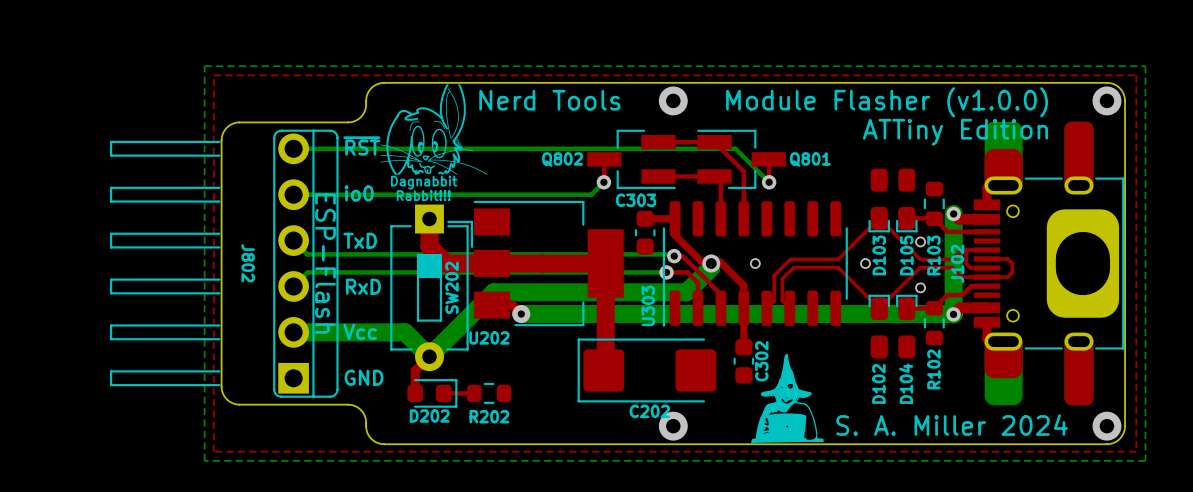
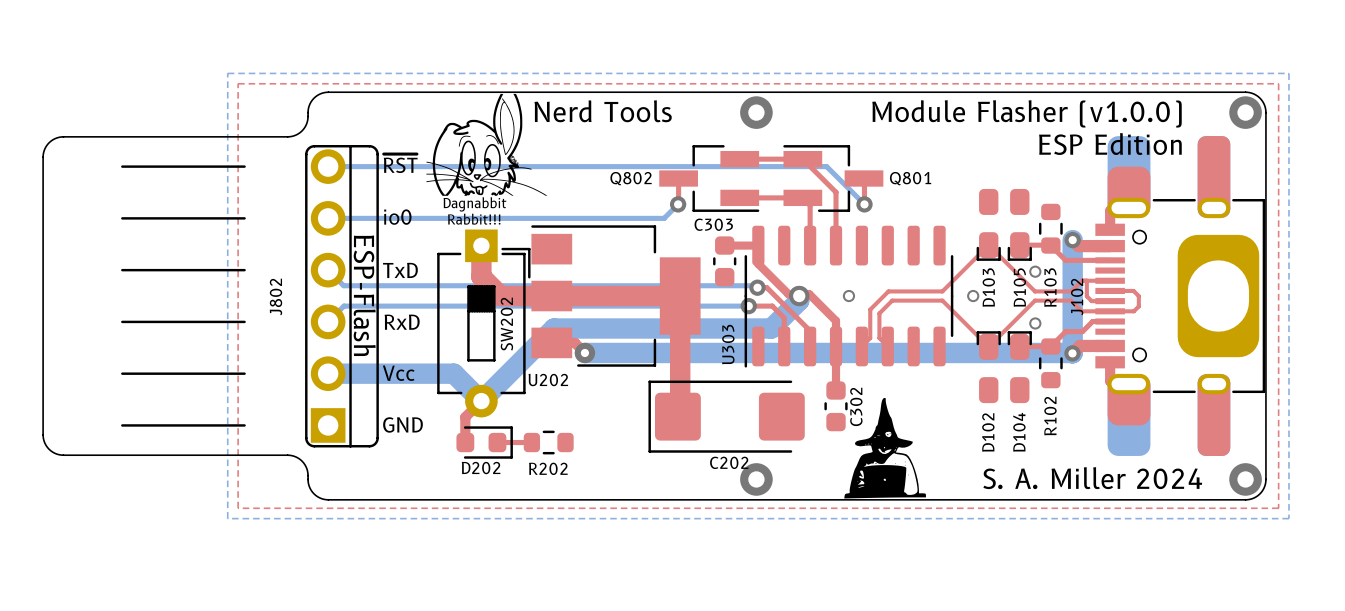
board edge: (384, 82) (376, 84) (370, 89) (366, 96) (364, 112) (354, 121) (257, 122) -> (430, 92) (321, 93) (314, 98) (310, 103) (307, 121) (303, 129) (296, 134) (287, 136)
board edge: (239, 122) (226, 127) (221, 140) (221, 388) (226, 399) (239, 404) -> (267, 136) (61, 136) (49, 142) (44, 150) (43, 157) (43, 434) (47, 447) (54, 453) (63, 455) (267, 455)
text: ATTiny Edition (955, 132) -> ESP Edition (1110, 143)
J802 footprint: [110, 133, 309, 394] -> [121, 149, 346, 443]
J802 name rotation: 0° (248, 263) -> 180° (275, 297)
board edge: (257, 404) (354, 405) (364, 414) (366, 430) (370, 437) (376, 442) (384, 444) -> (287, 455) (296, 457) (303, 462) (307, 471) (310, 488) (315, 495) (321, 498) (430, 499)

